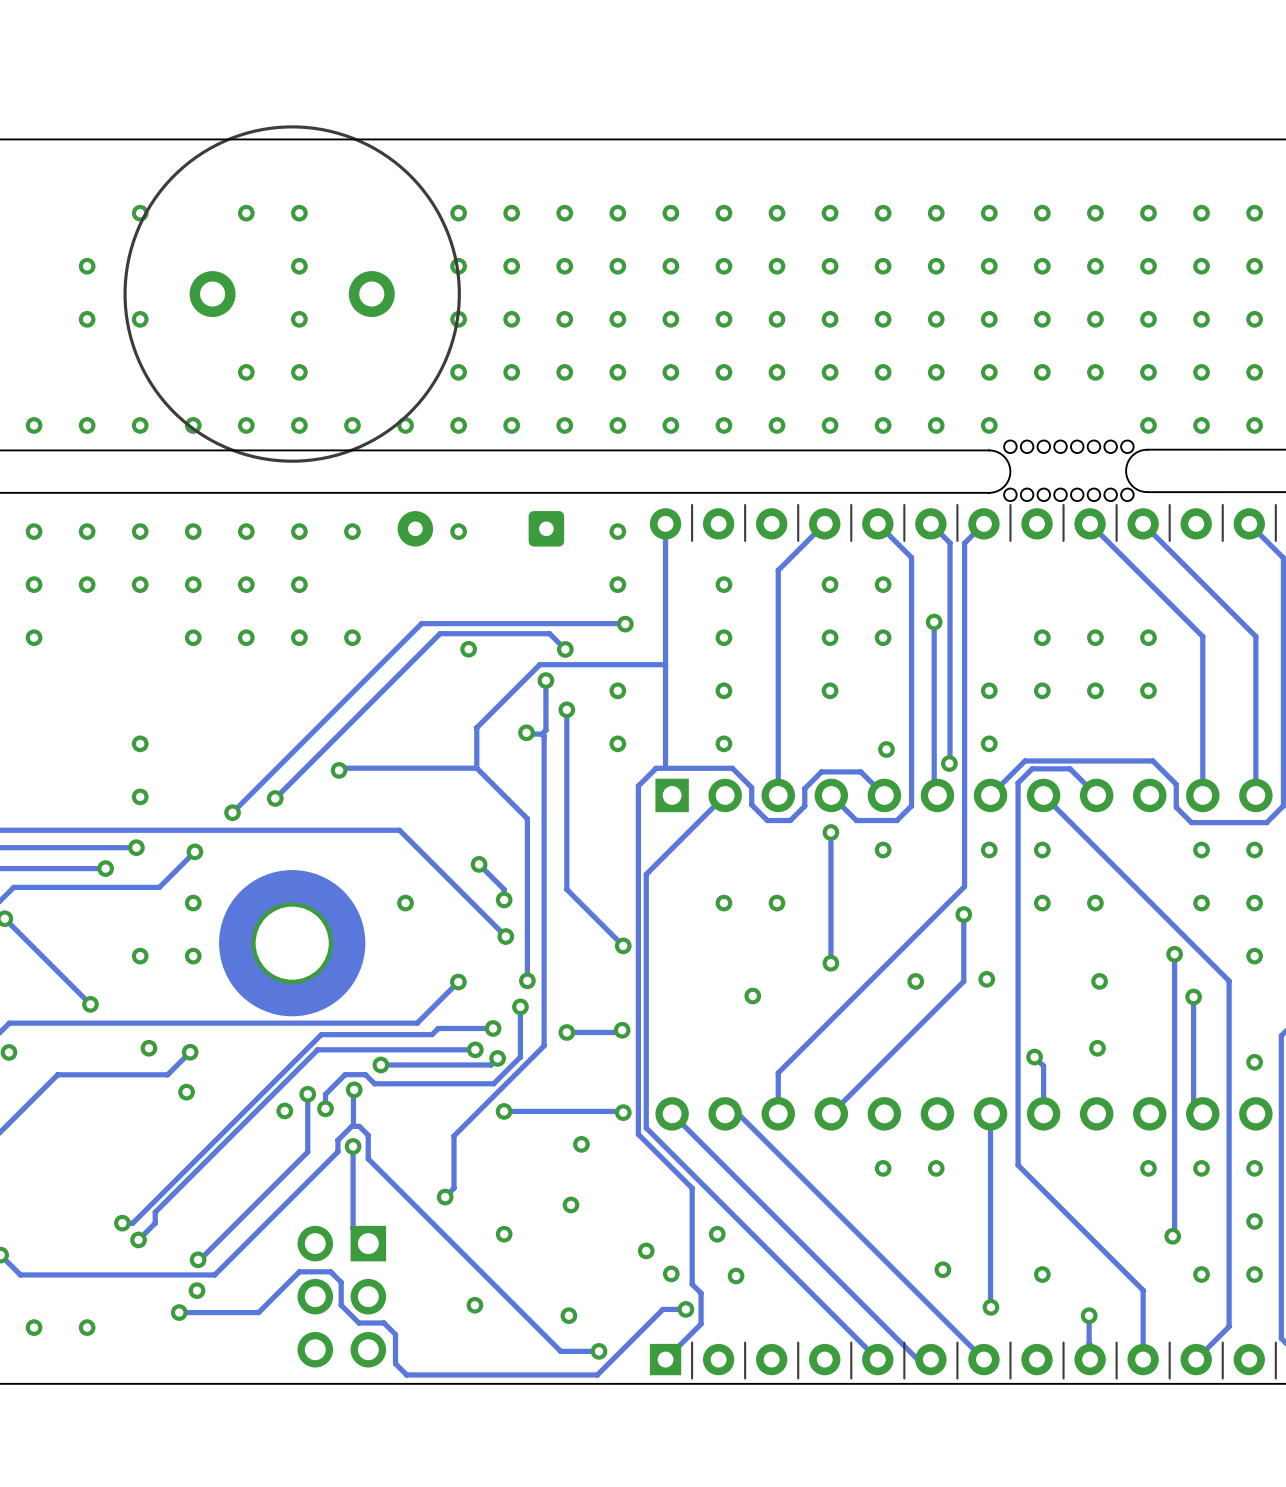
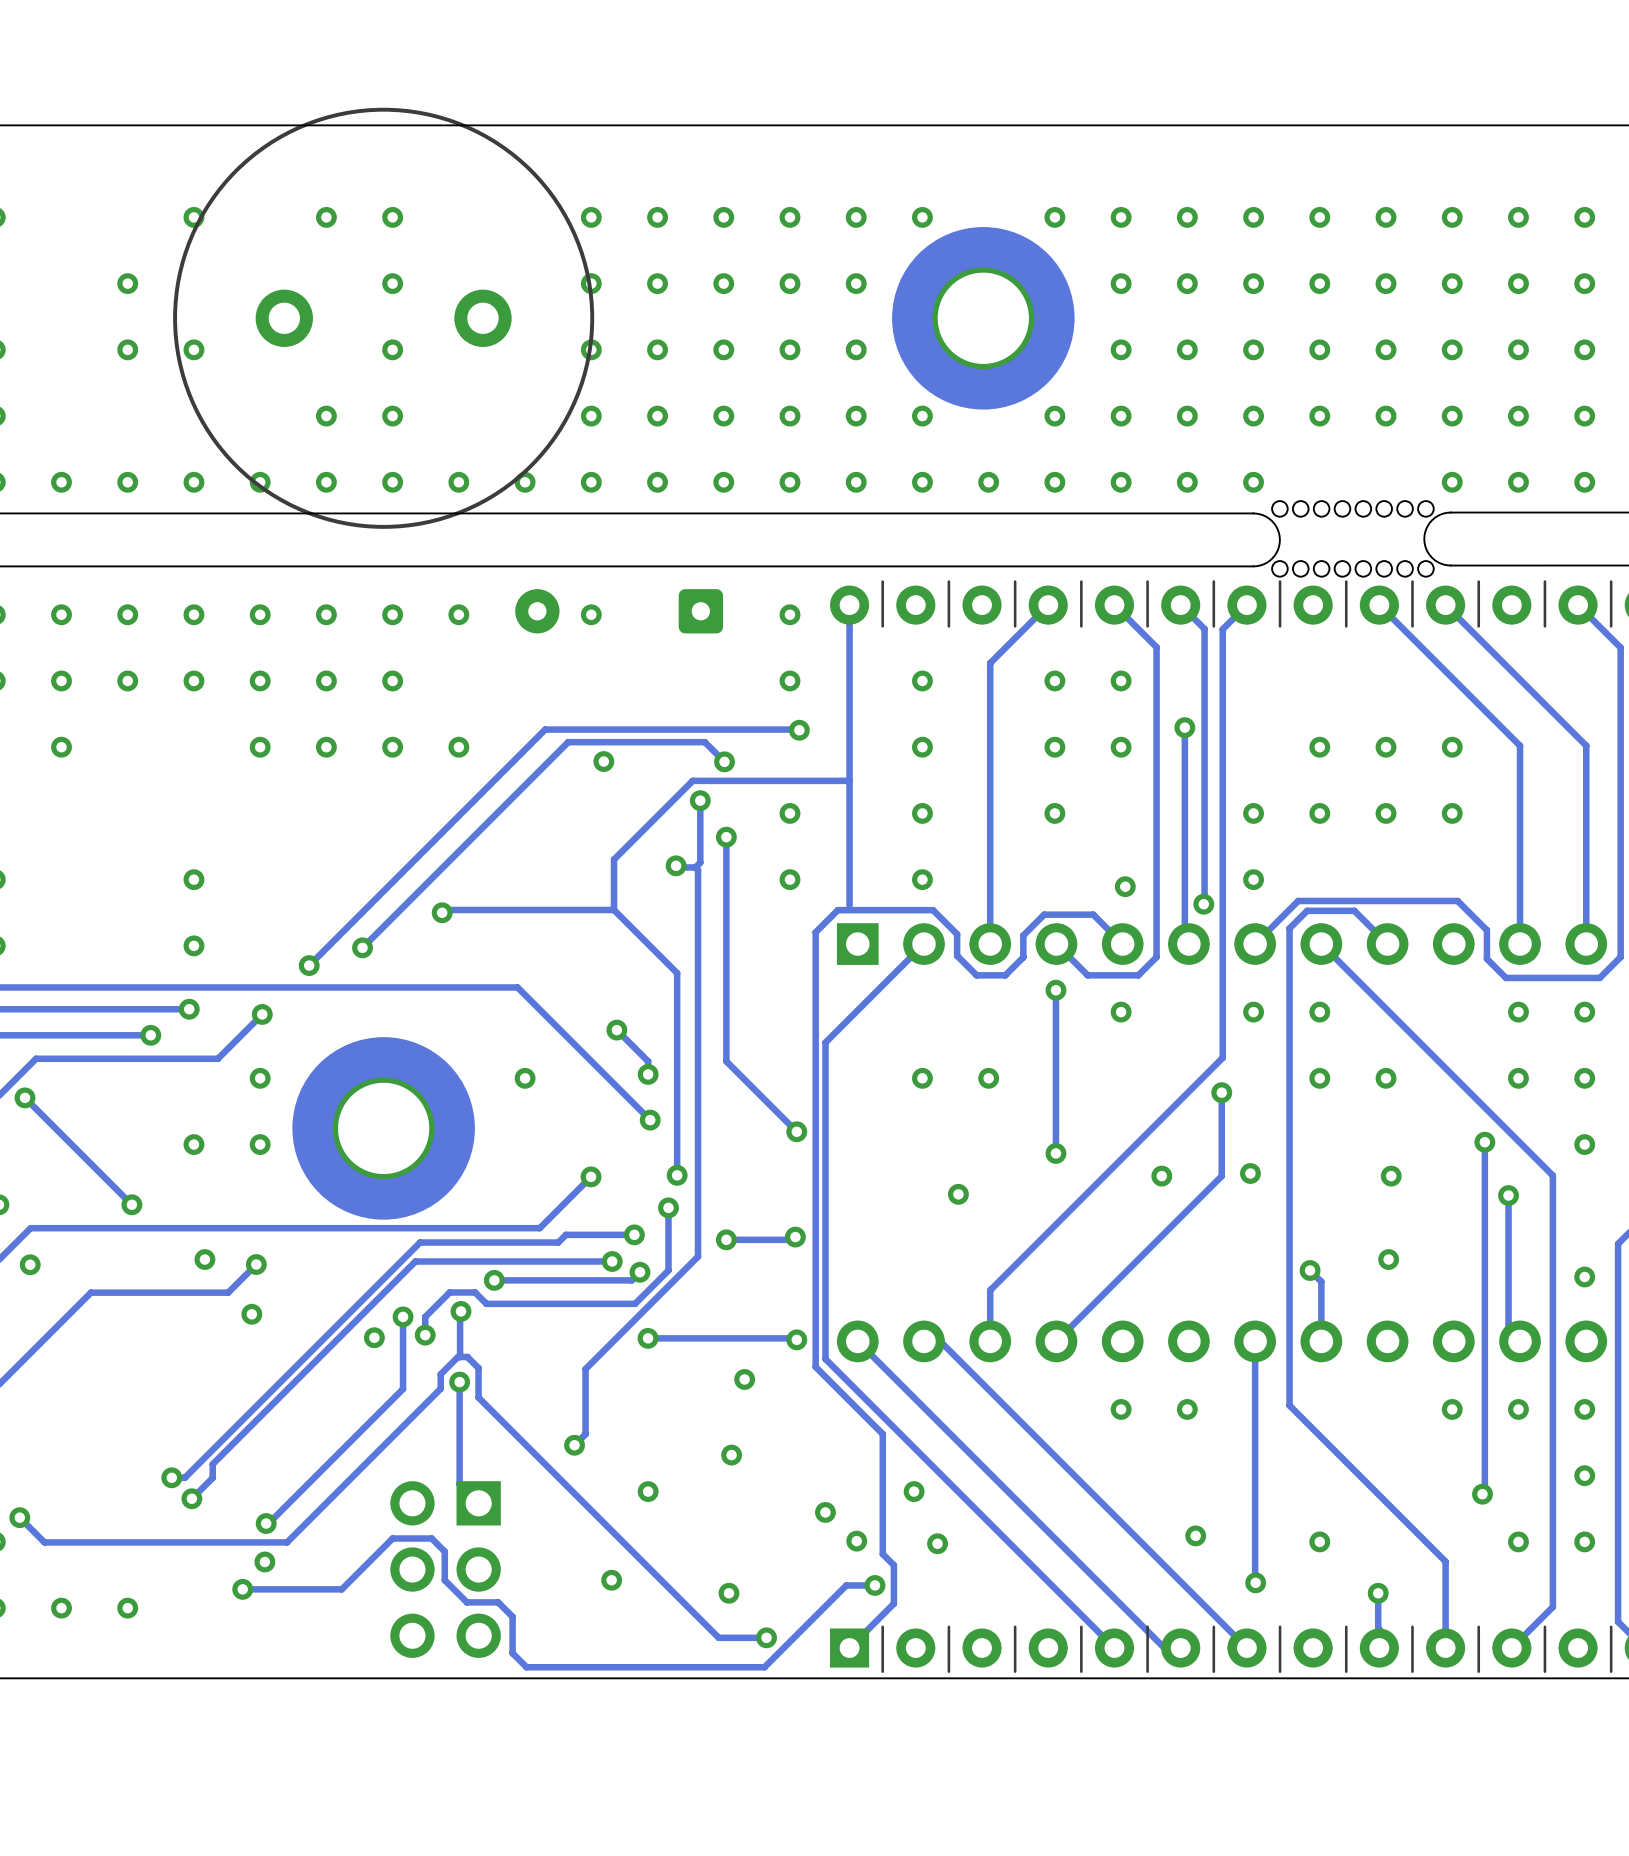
via: (777, 213) -> none
via: (723, 266) -> none
via: (777, 266) -> none
via: (830, 266) -> none
part: none -> (983, 318)
via: (723, 319) -> none
via: (777, 319) -> none
via: (830, 319) -> none
via: (777, 372) -> none

